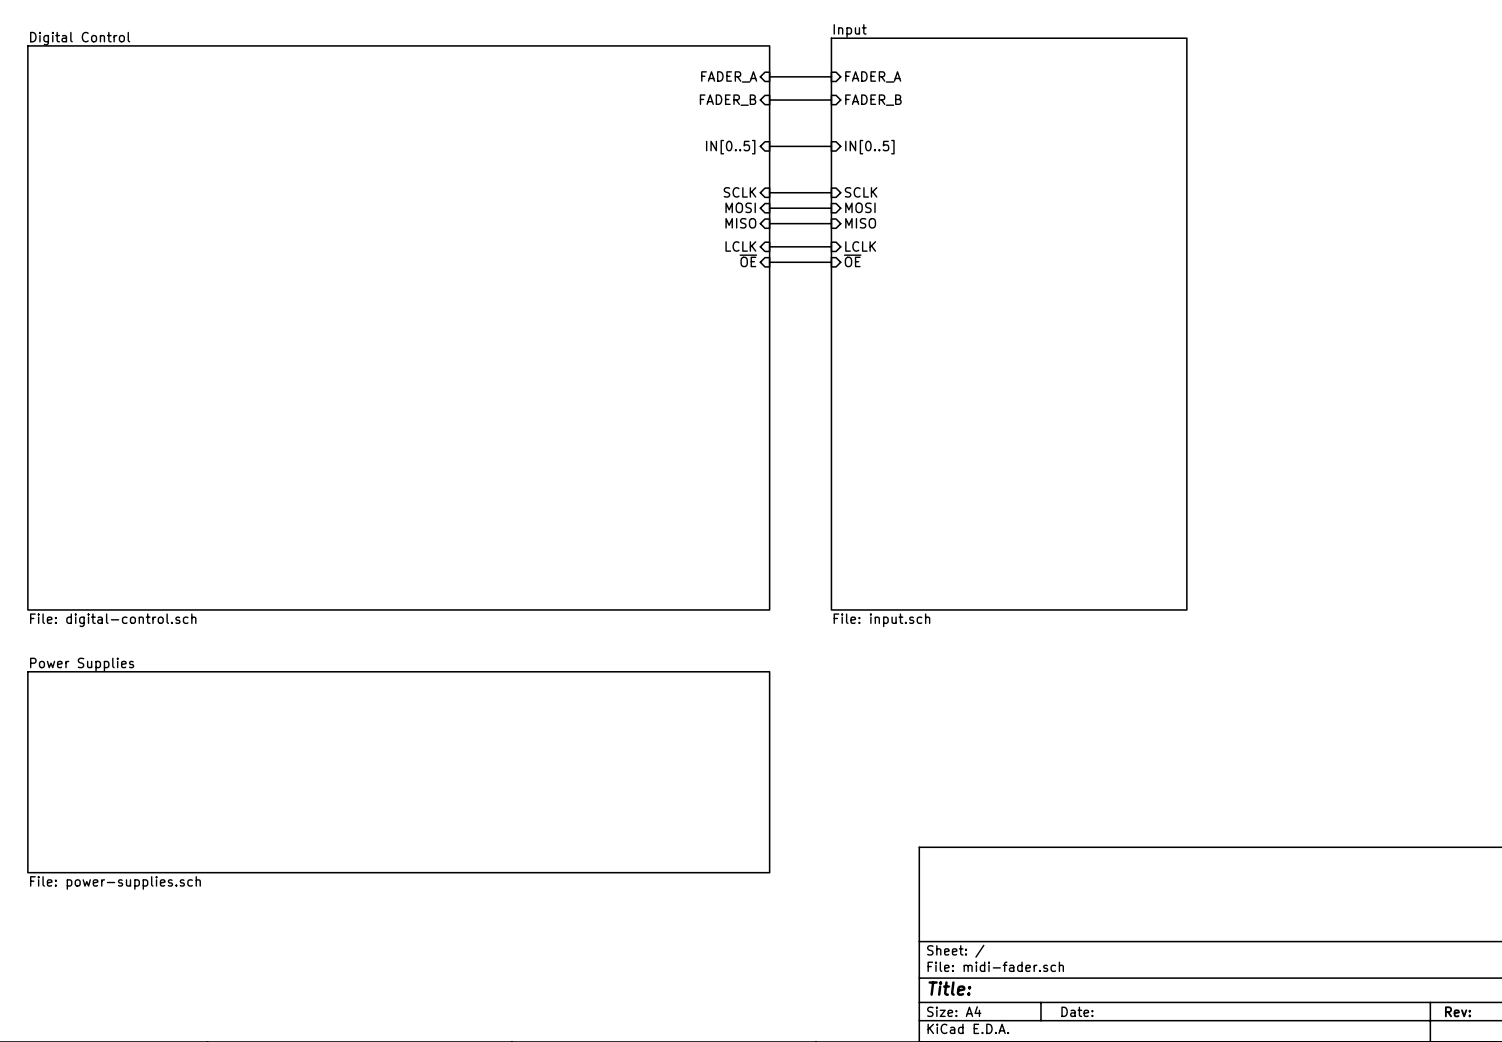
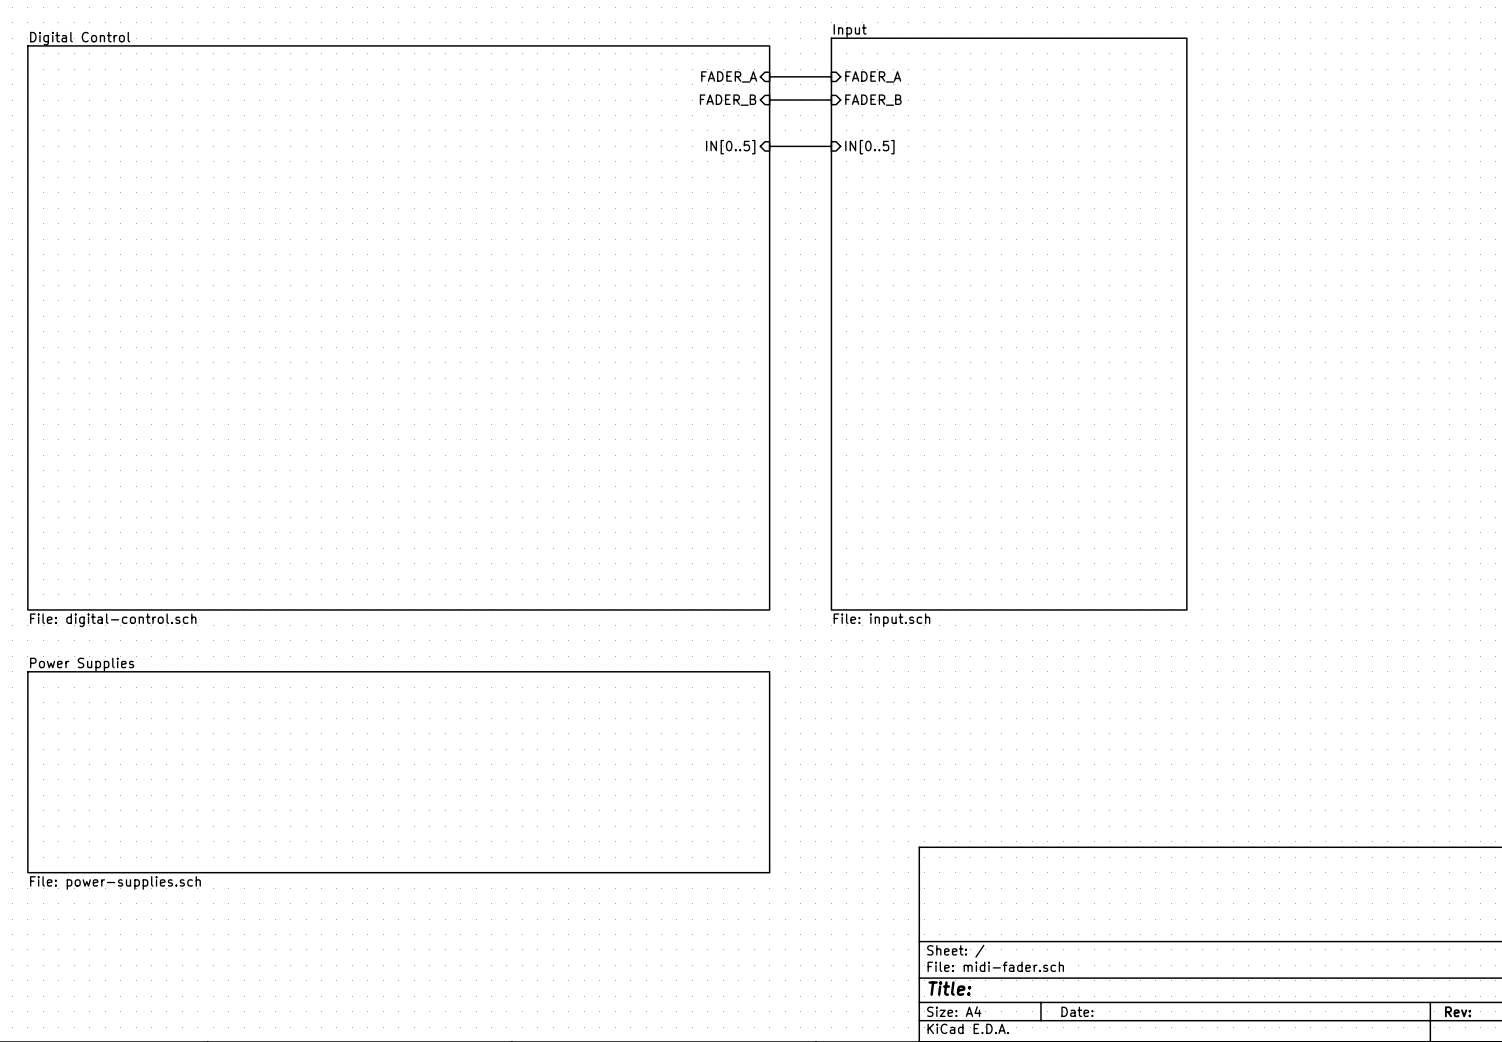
sheet pin: SCLK (739, 192) -> none
wire: (769, 192) (831, 192) -> none
sheet pin: SCLK (861, 192) -> none
sheet pin: MOSI (740, 207) -> none
sheet pin: MOSI (860, 207) -> none
wire: (769, 208) (831, 208) -> none
sheet pin: MISO (740, 223) -> none
wire: (769, 223) (831, 223) -> none
sheet pin: MISO (860, 223) -> none
sheet pin: LCLK (740, 246) -> none
wire: (769, 246) (831, 246) -> none
sheet pin: LCLK (860, 246) -> none
sheet pin: ~{OE} (748, 260) -> none
sheet pin: ~{OE} (852, 260) -> none
wire: (769, 262) (831, 262) -> none

